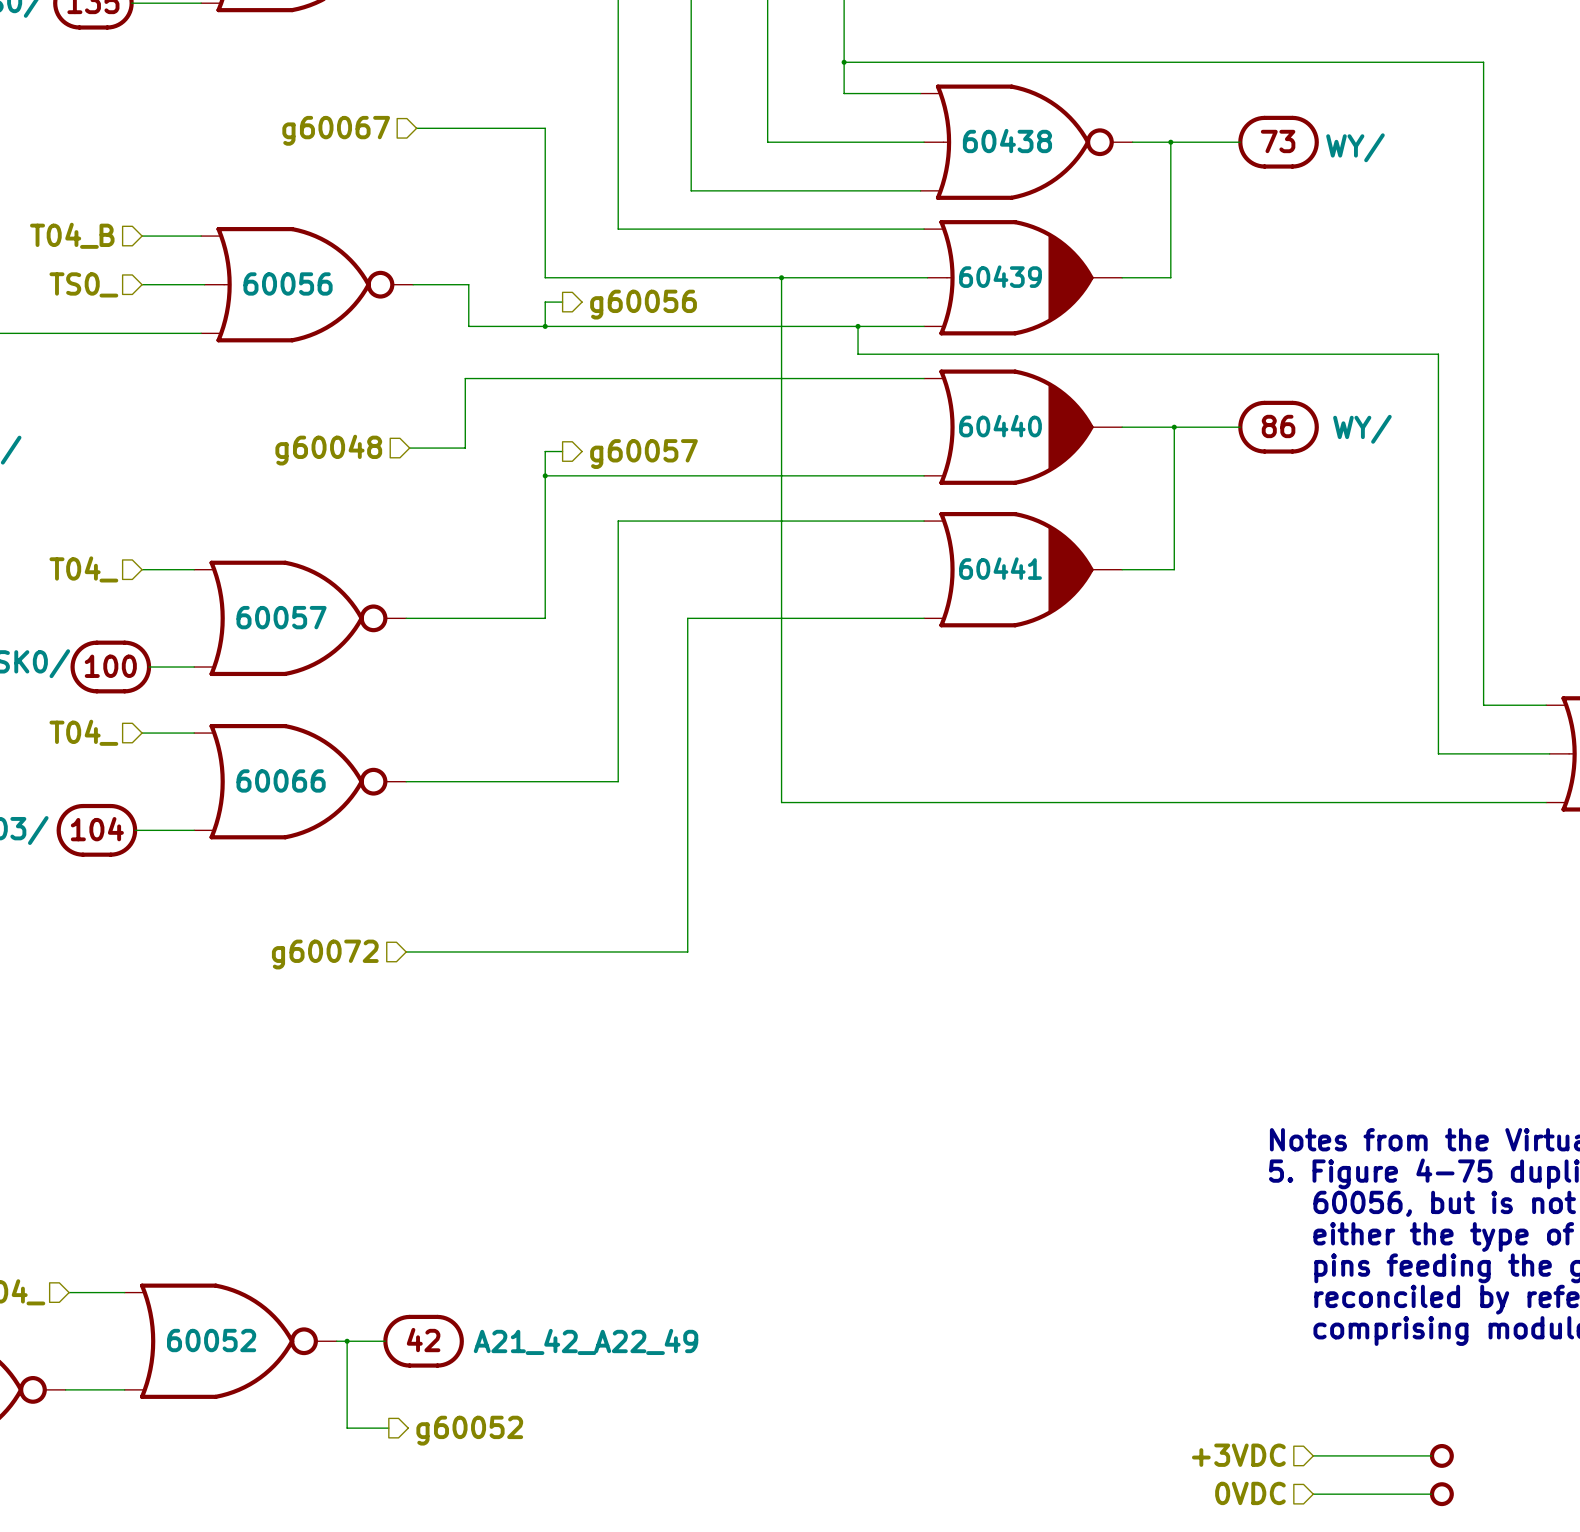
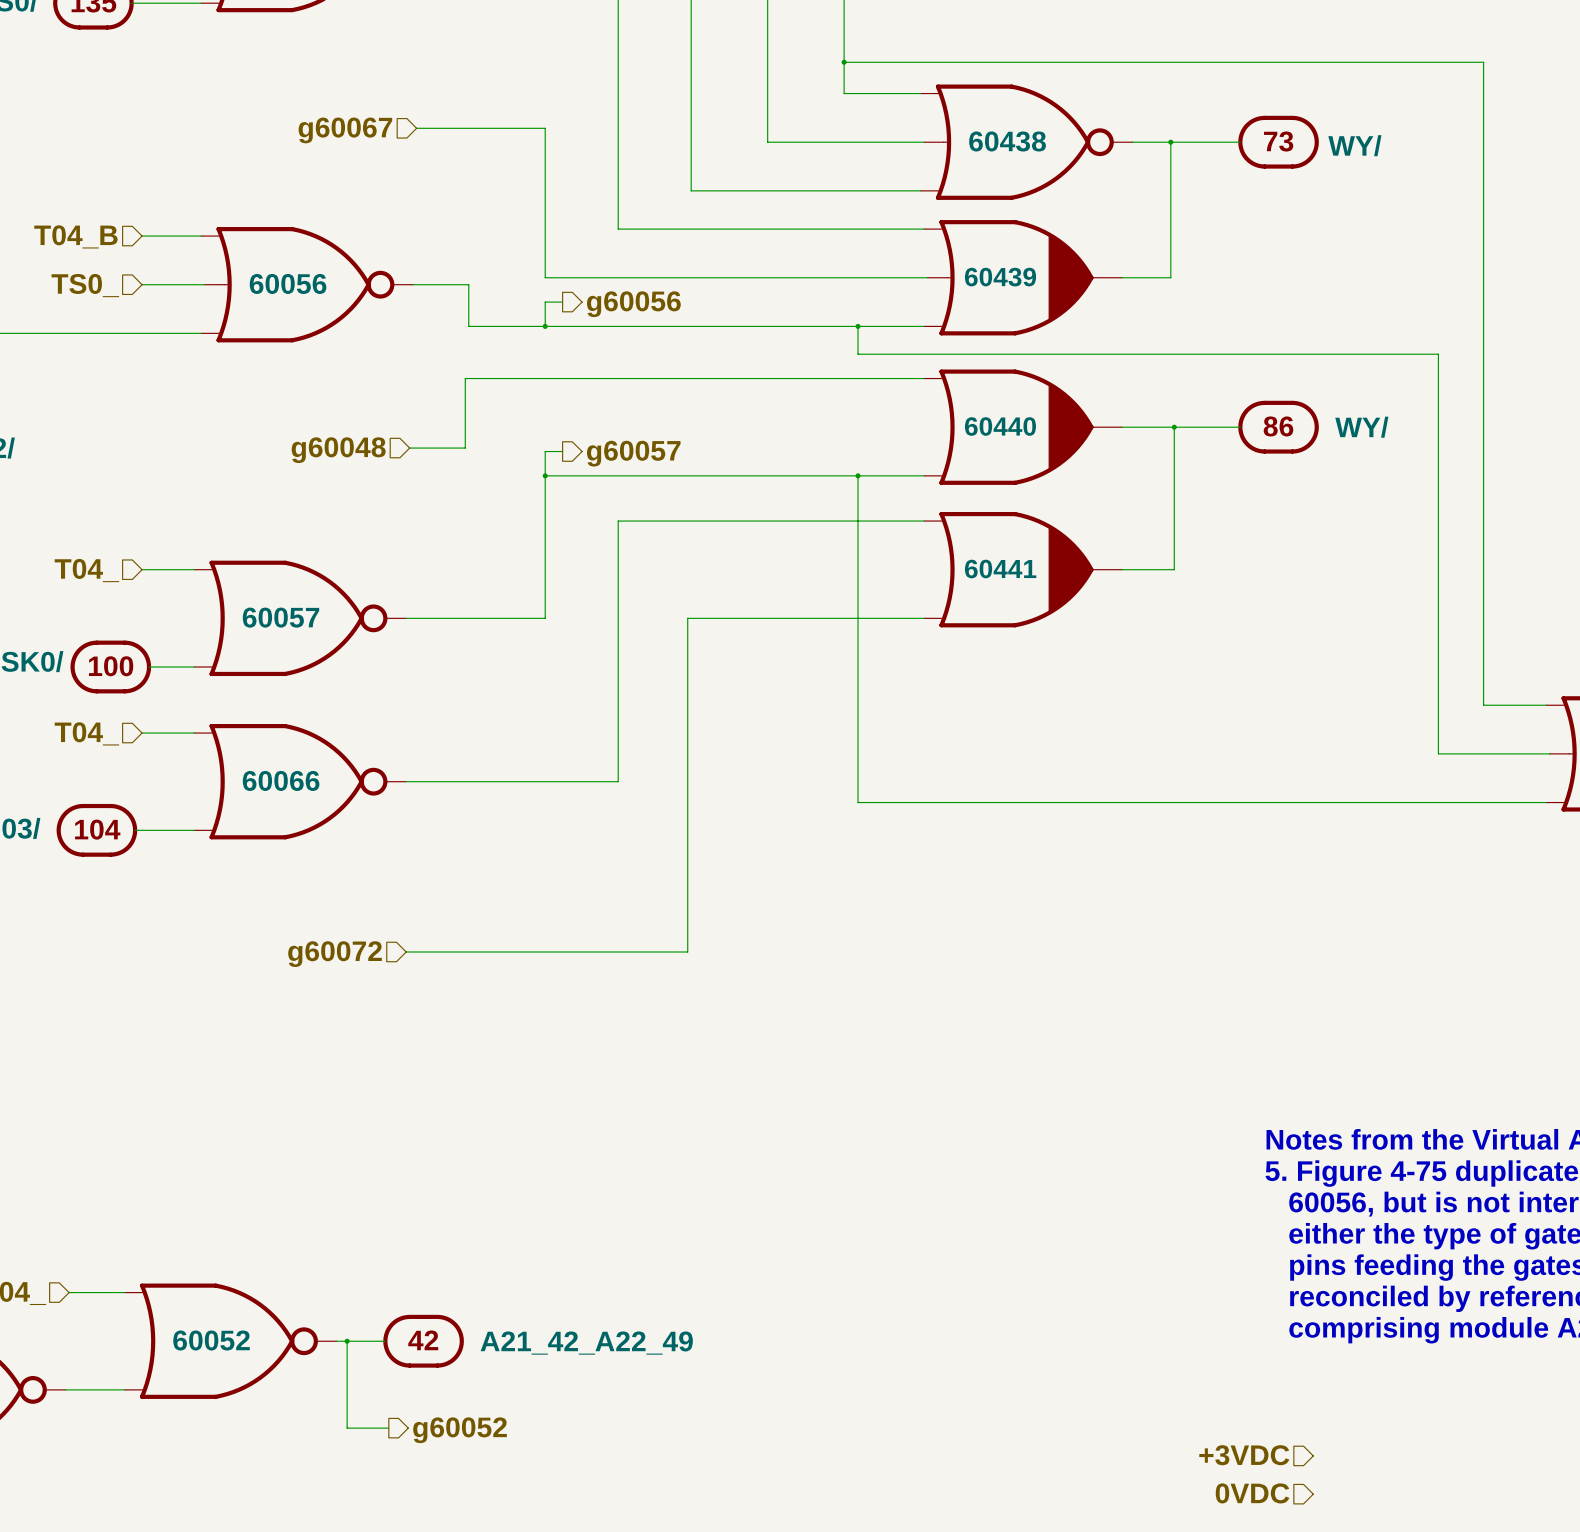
wire: (781, 277) (781, 802) (858, 802) -> (858, 475) (858, 802)
junction: (781, 277) -> none
junction: none -> (858, 475)
wire: (1313, 1455) (1431, 1455) -> none
part: (1441, 1455) -> none
wire: (1313, 1494) (1431, 1494) -> none
part: (1441, 1494) -> none

